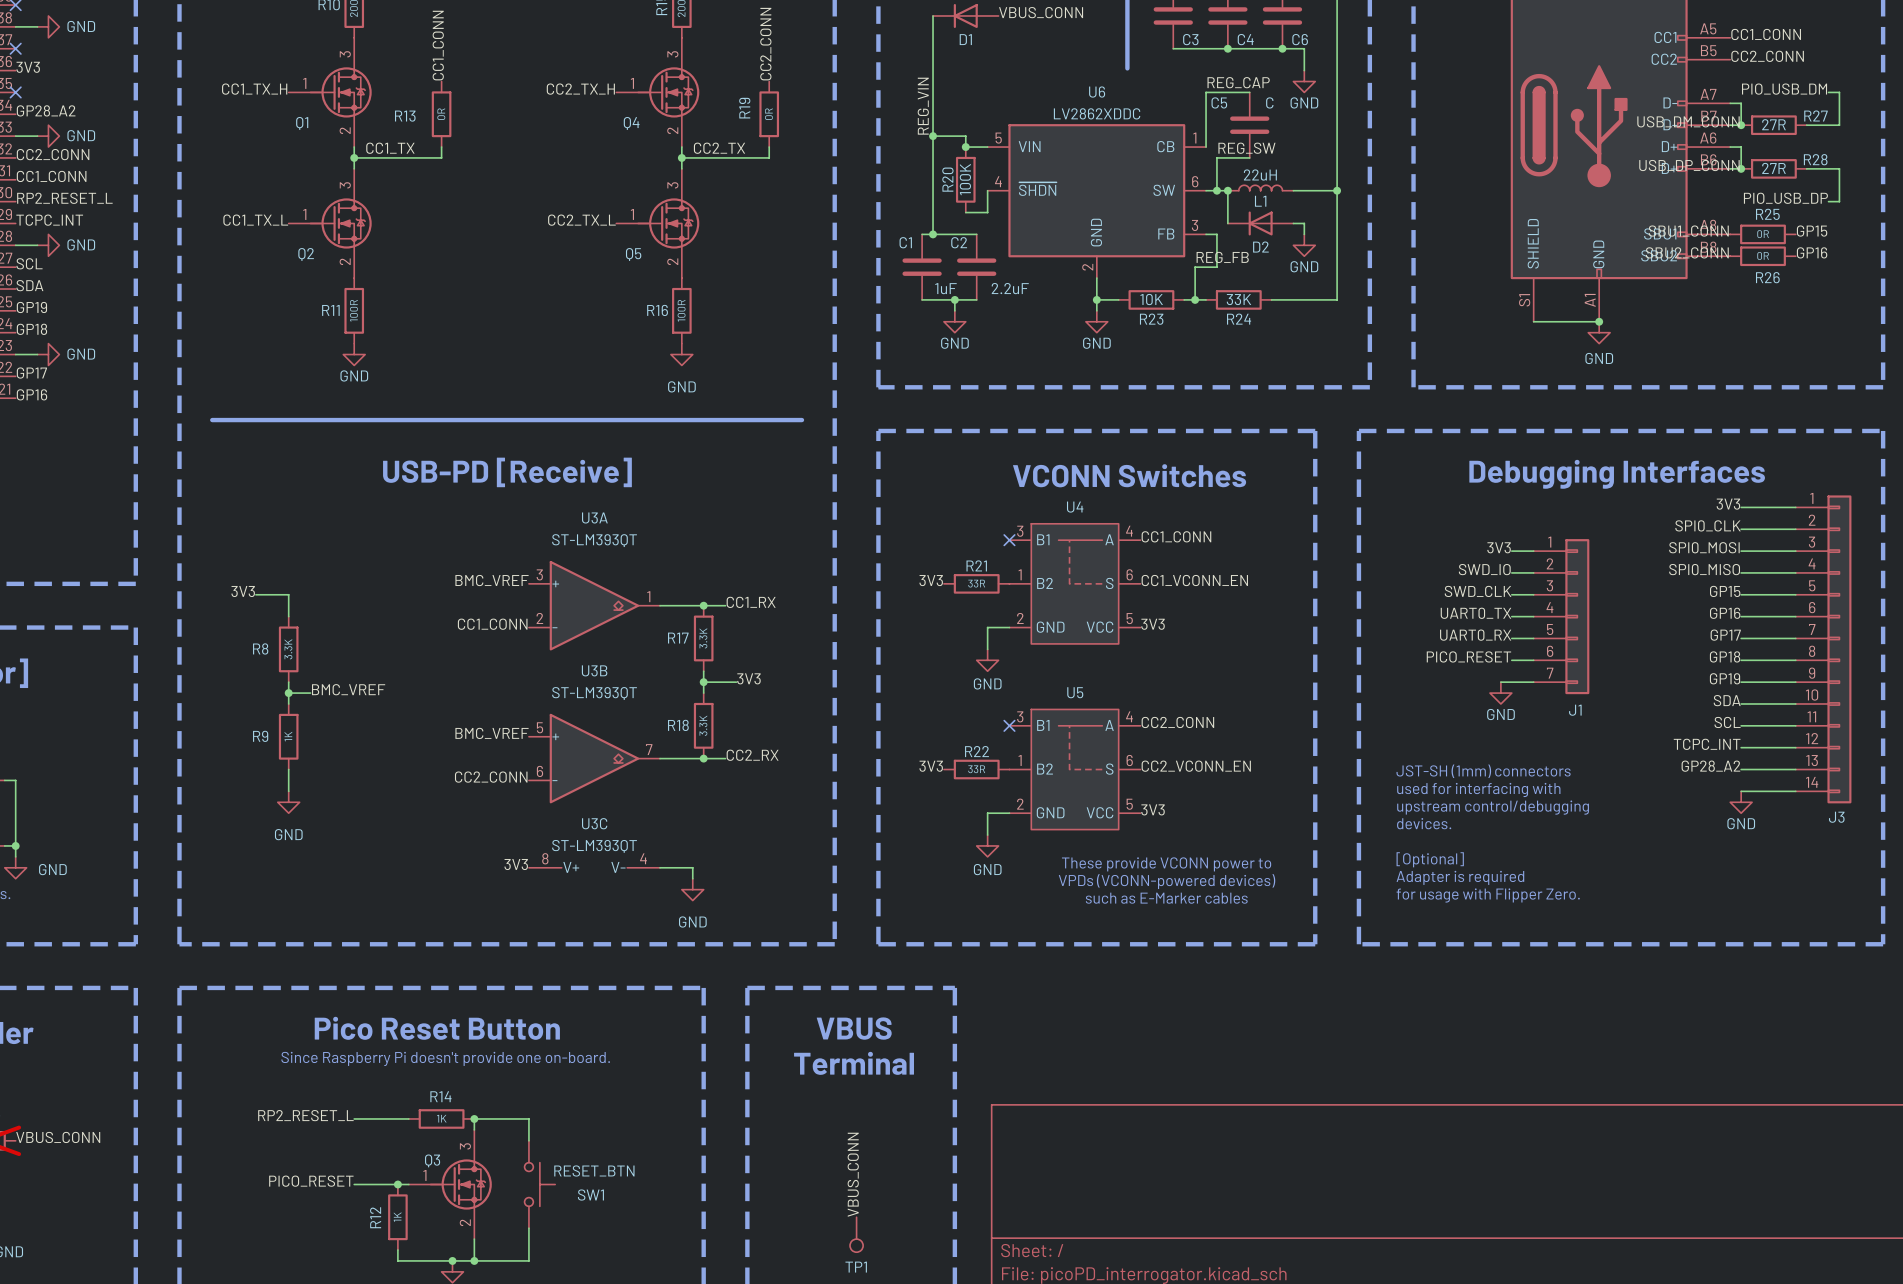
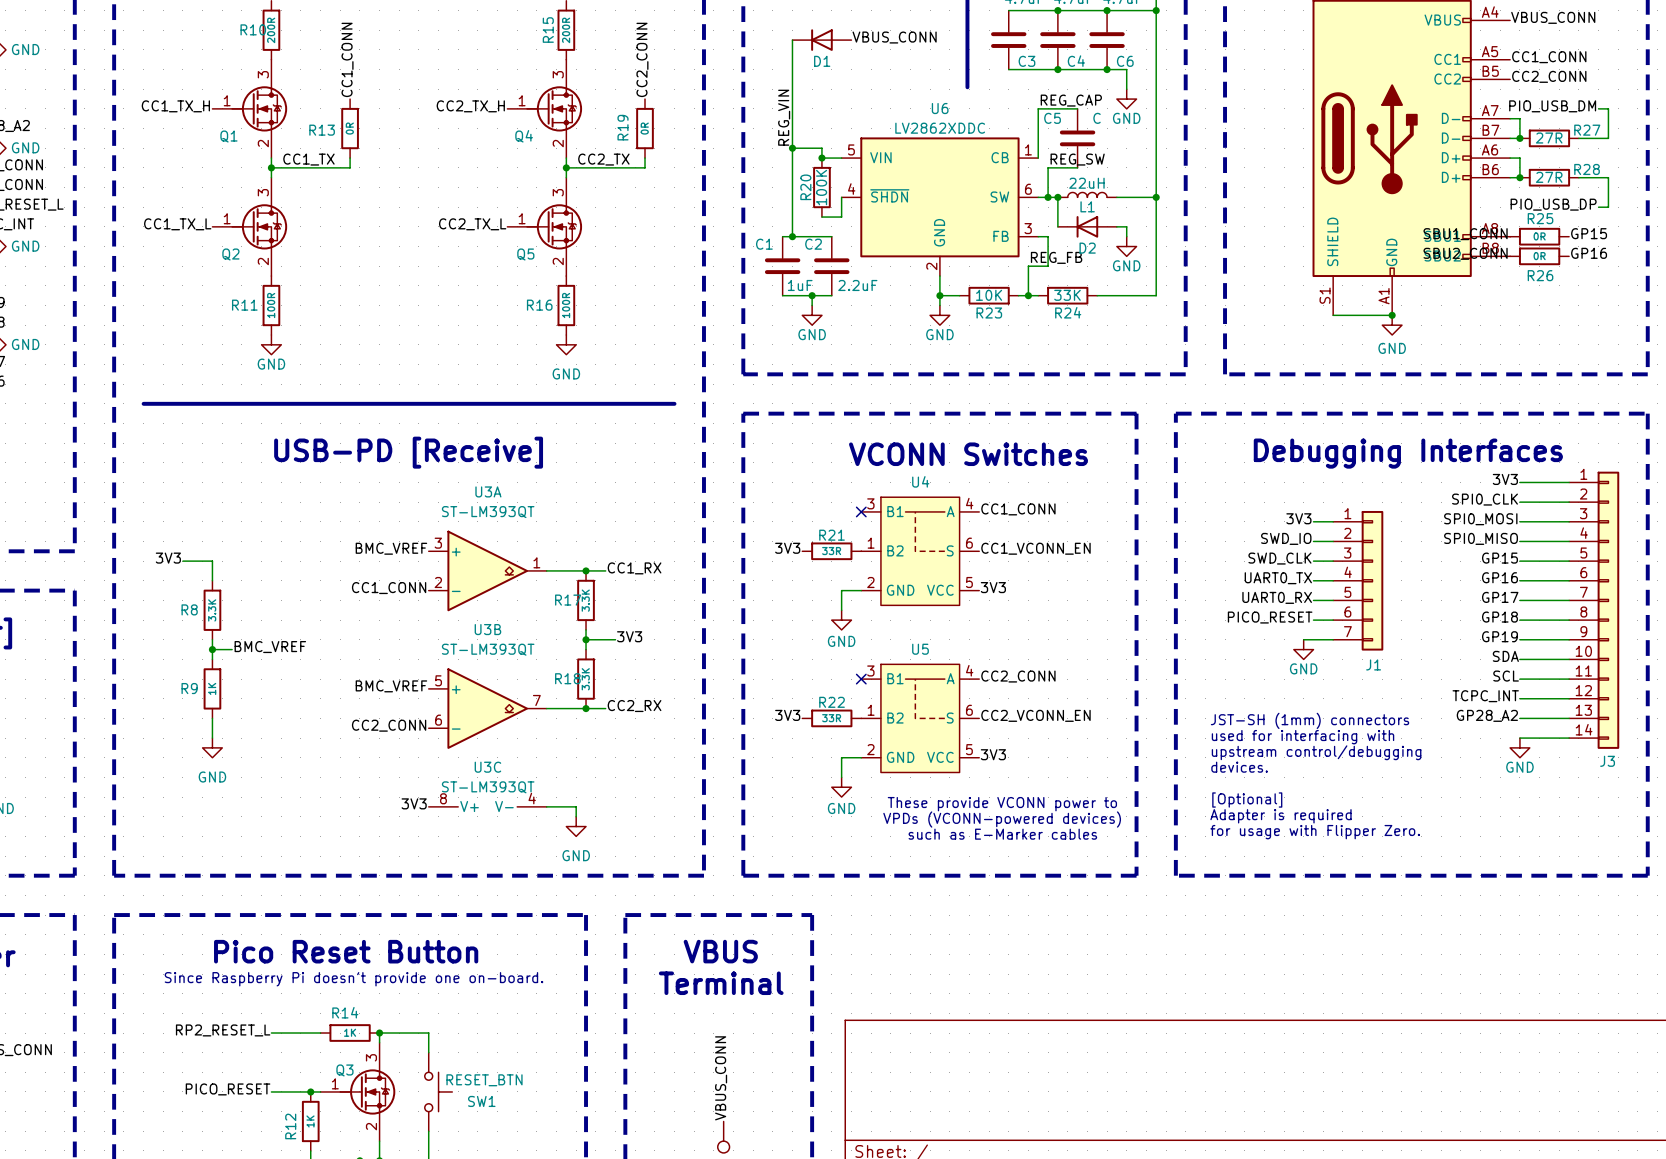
label: USB_DM_CONN (1688, 121) -> none
label: USB_DP_CONN (1689, 165) -> none

